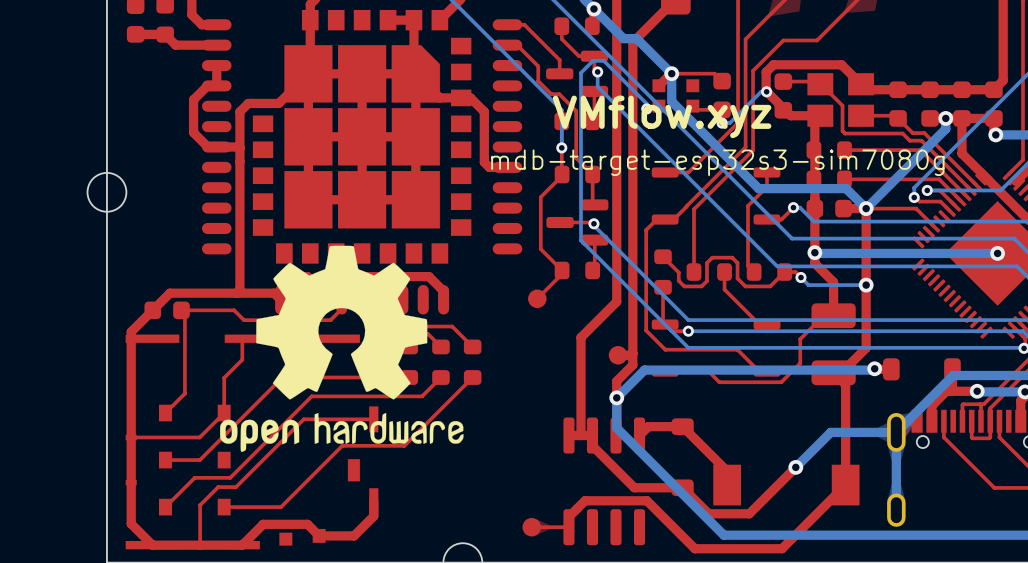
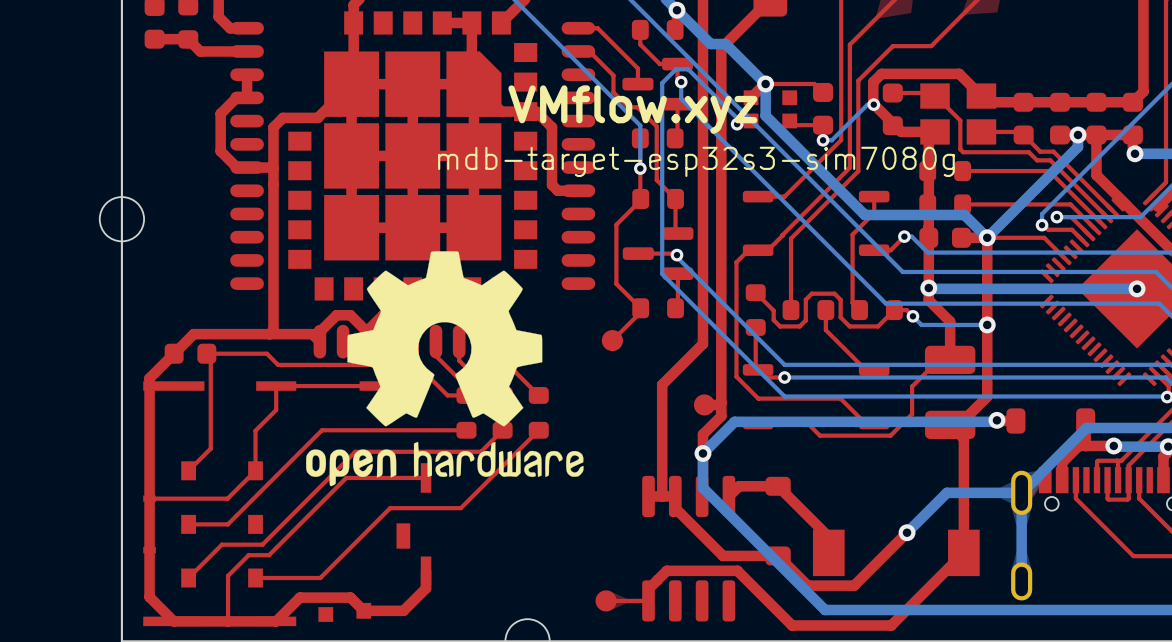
text position: VMflow.xyz (662, 116) -> VMflow.xyz (632, 109)
text position: mdb-target-esp32s3-sim7080g (717, 162) -> mdb-target-esp32s3-sim7080g (696, 161)
drawing position: (341, 348) -> (444, 368)

